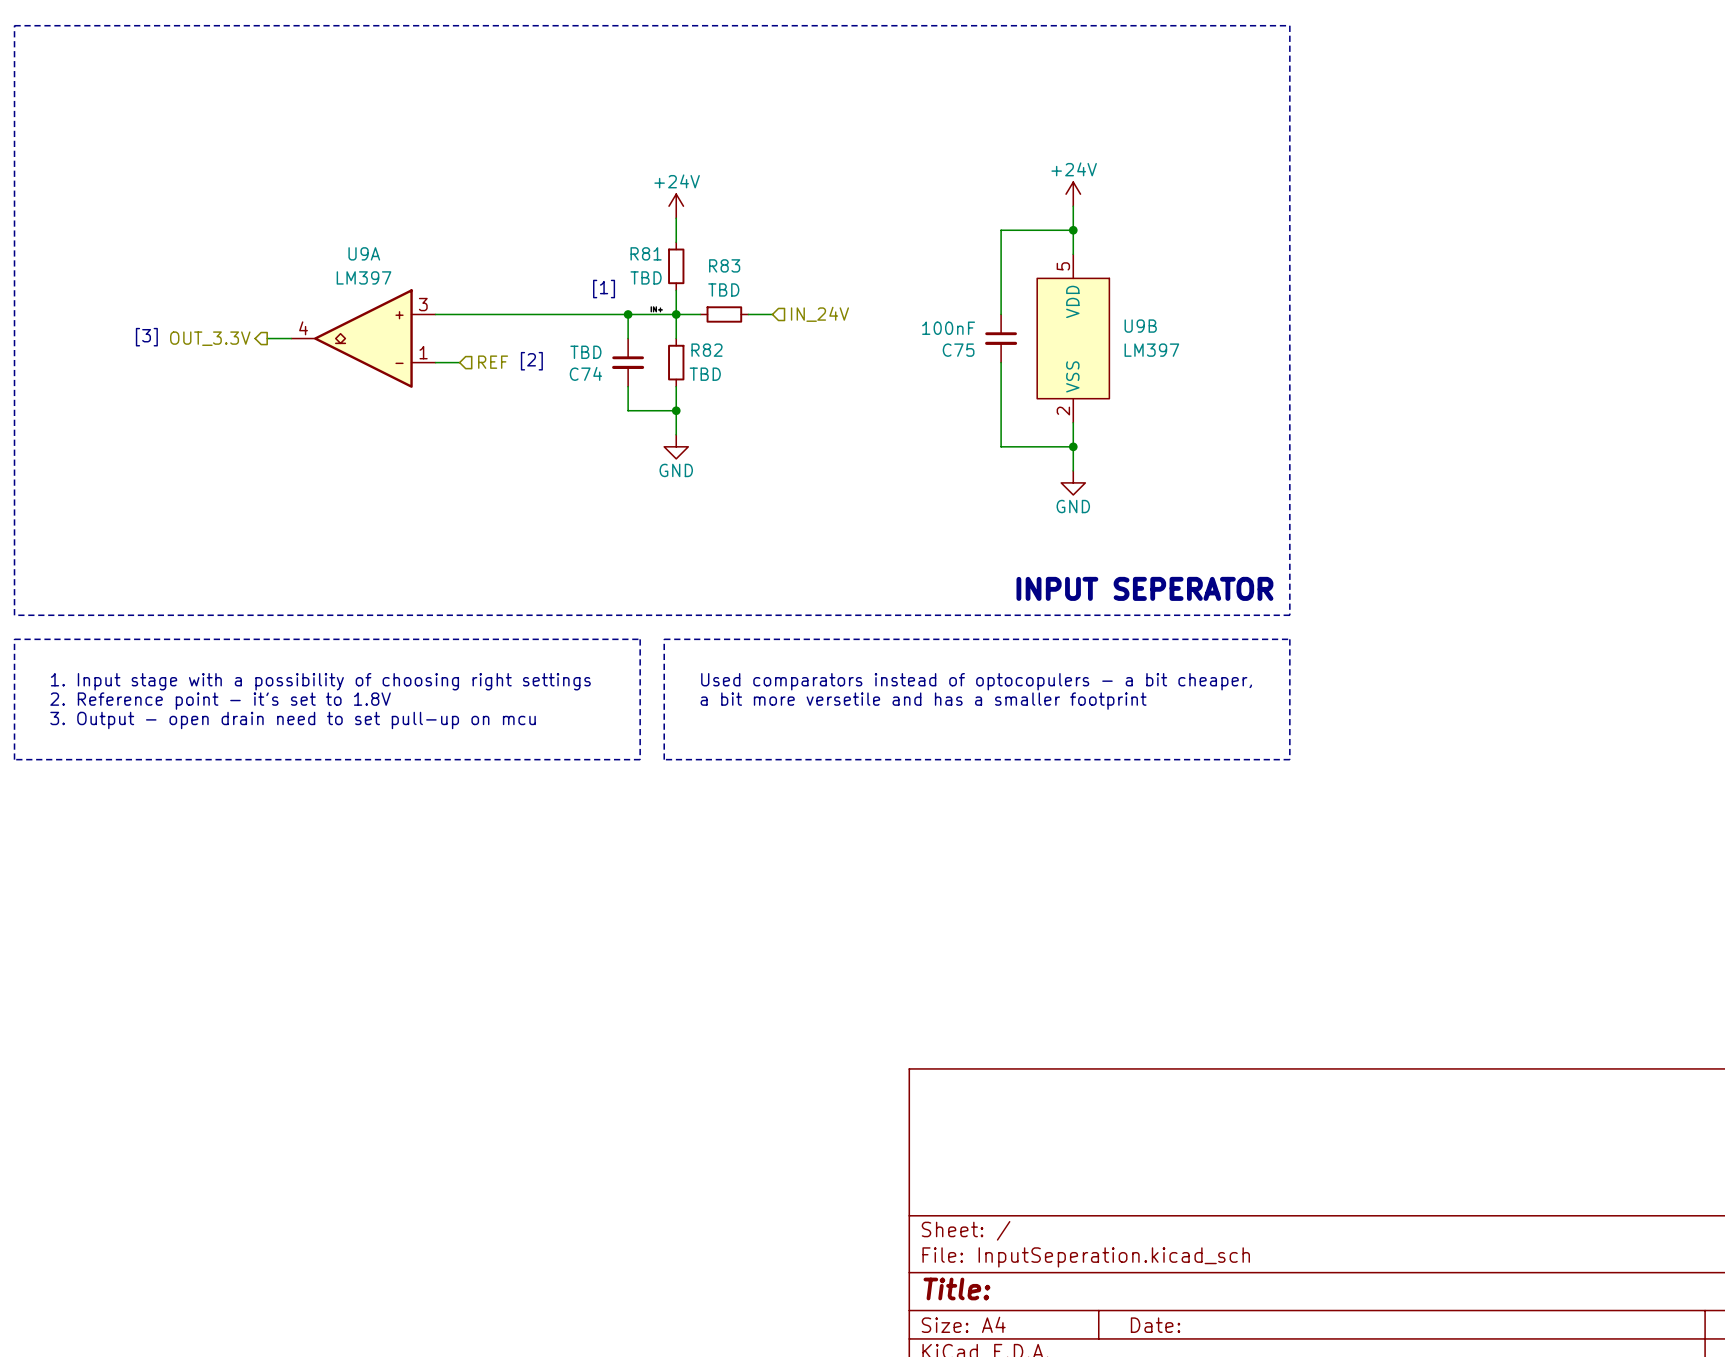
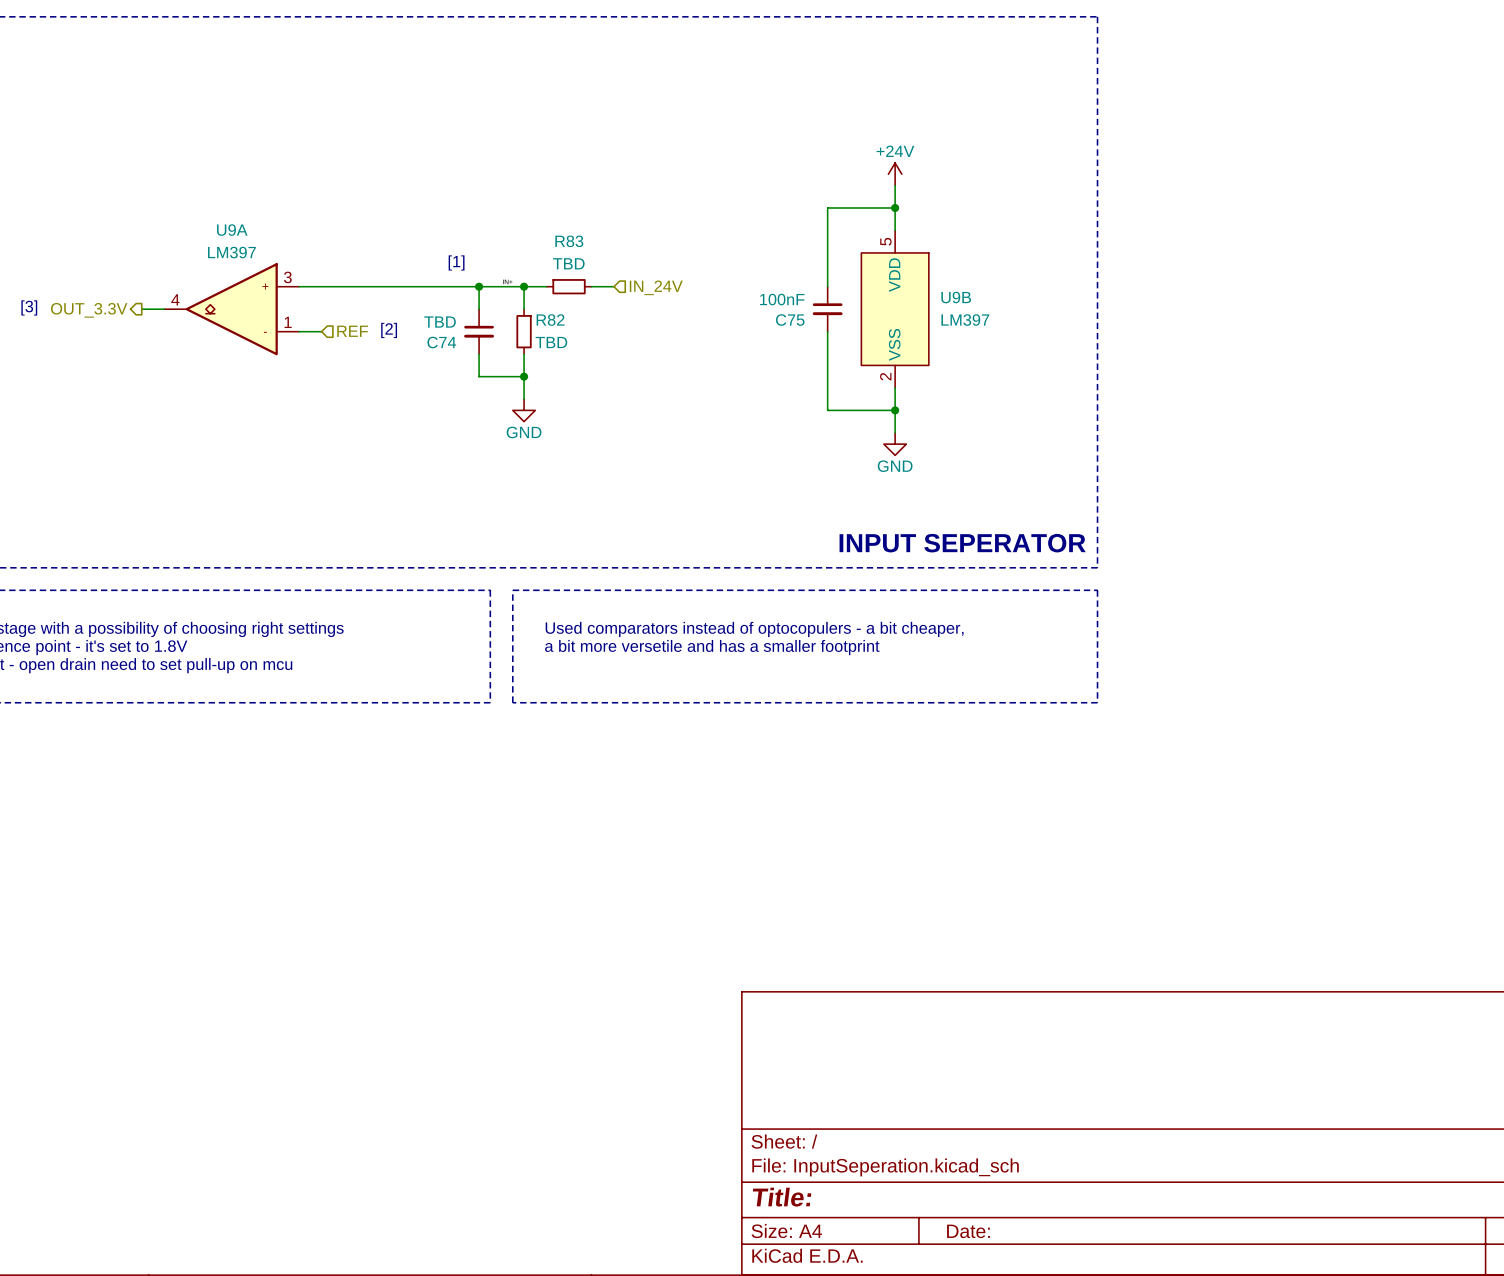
power symbol: +24V (676, 206) -> none
wire: (676, 218) (676, 242) -> none
R81: TBD (676, 266) -> none
wire: (676, 290) (676, 314) -> none

